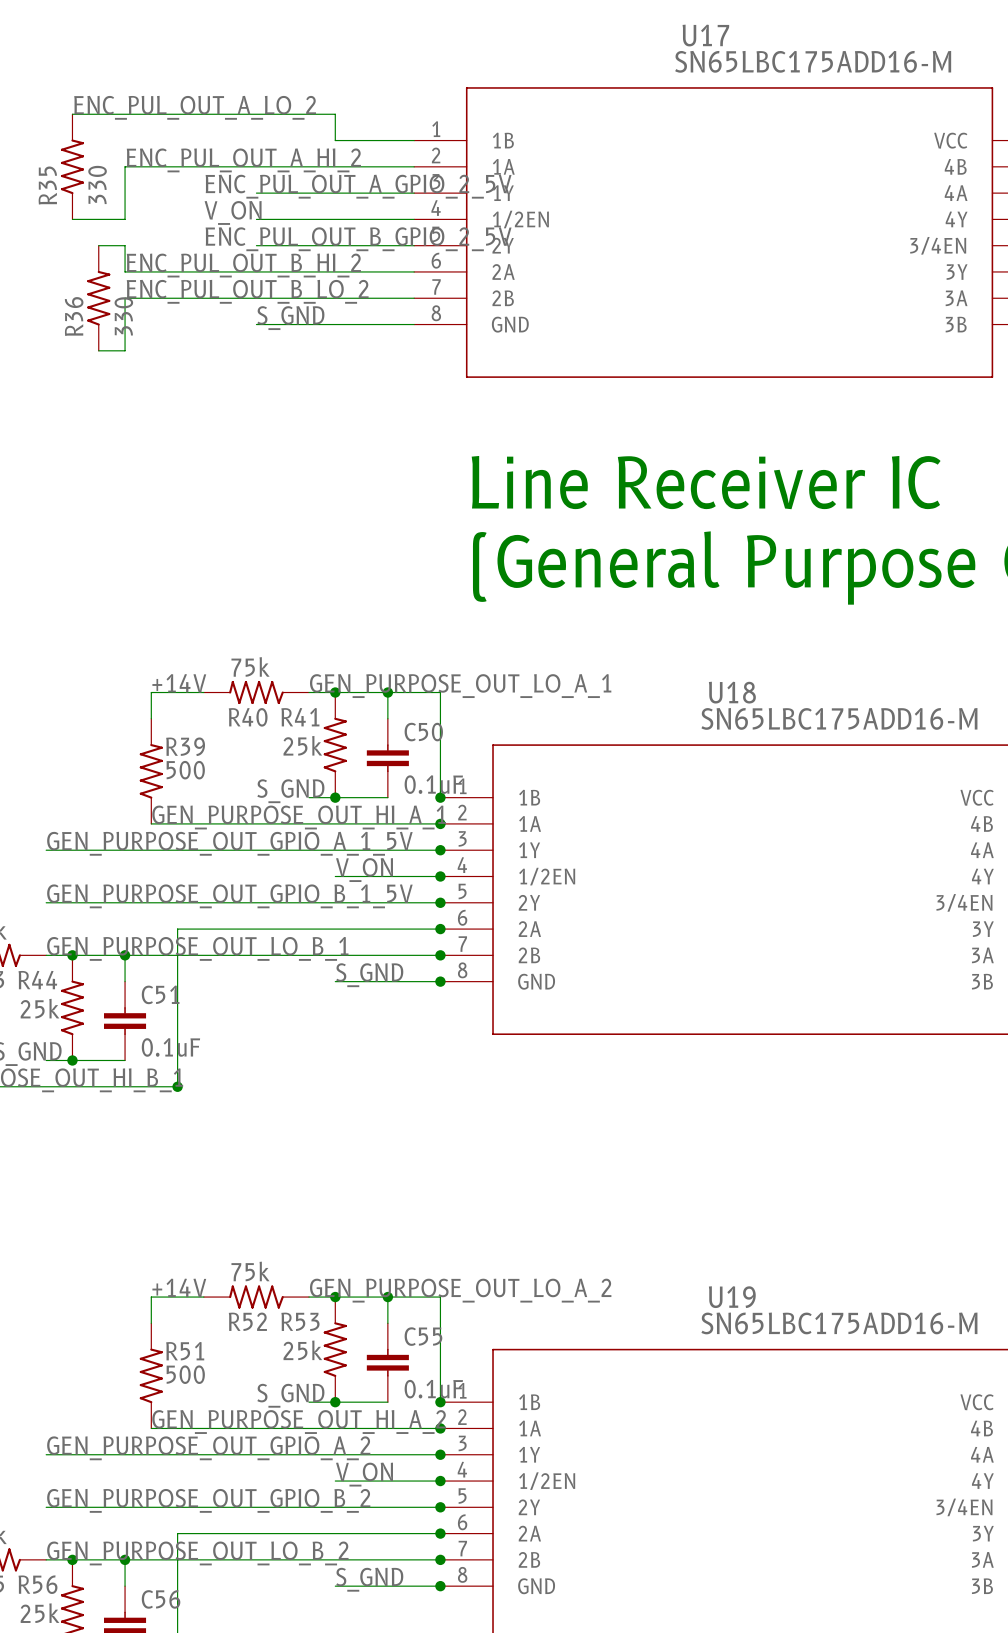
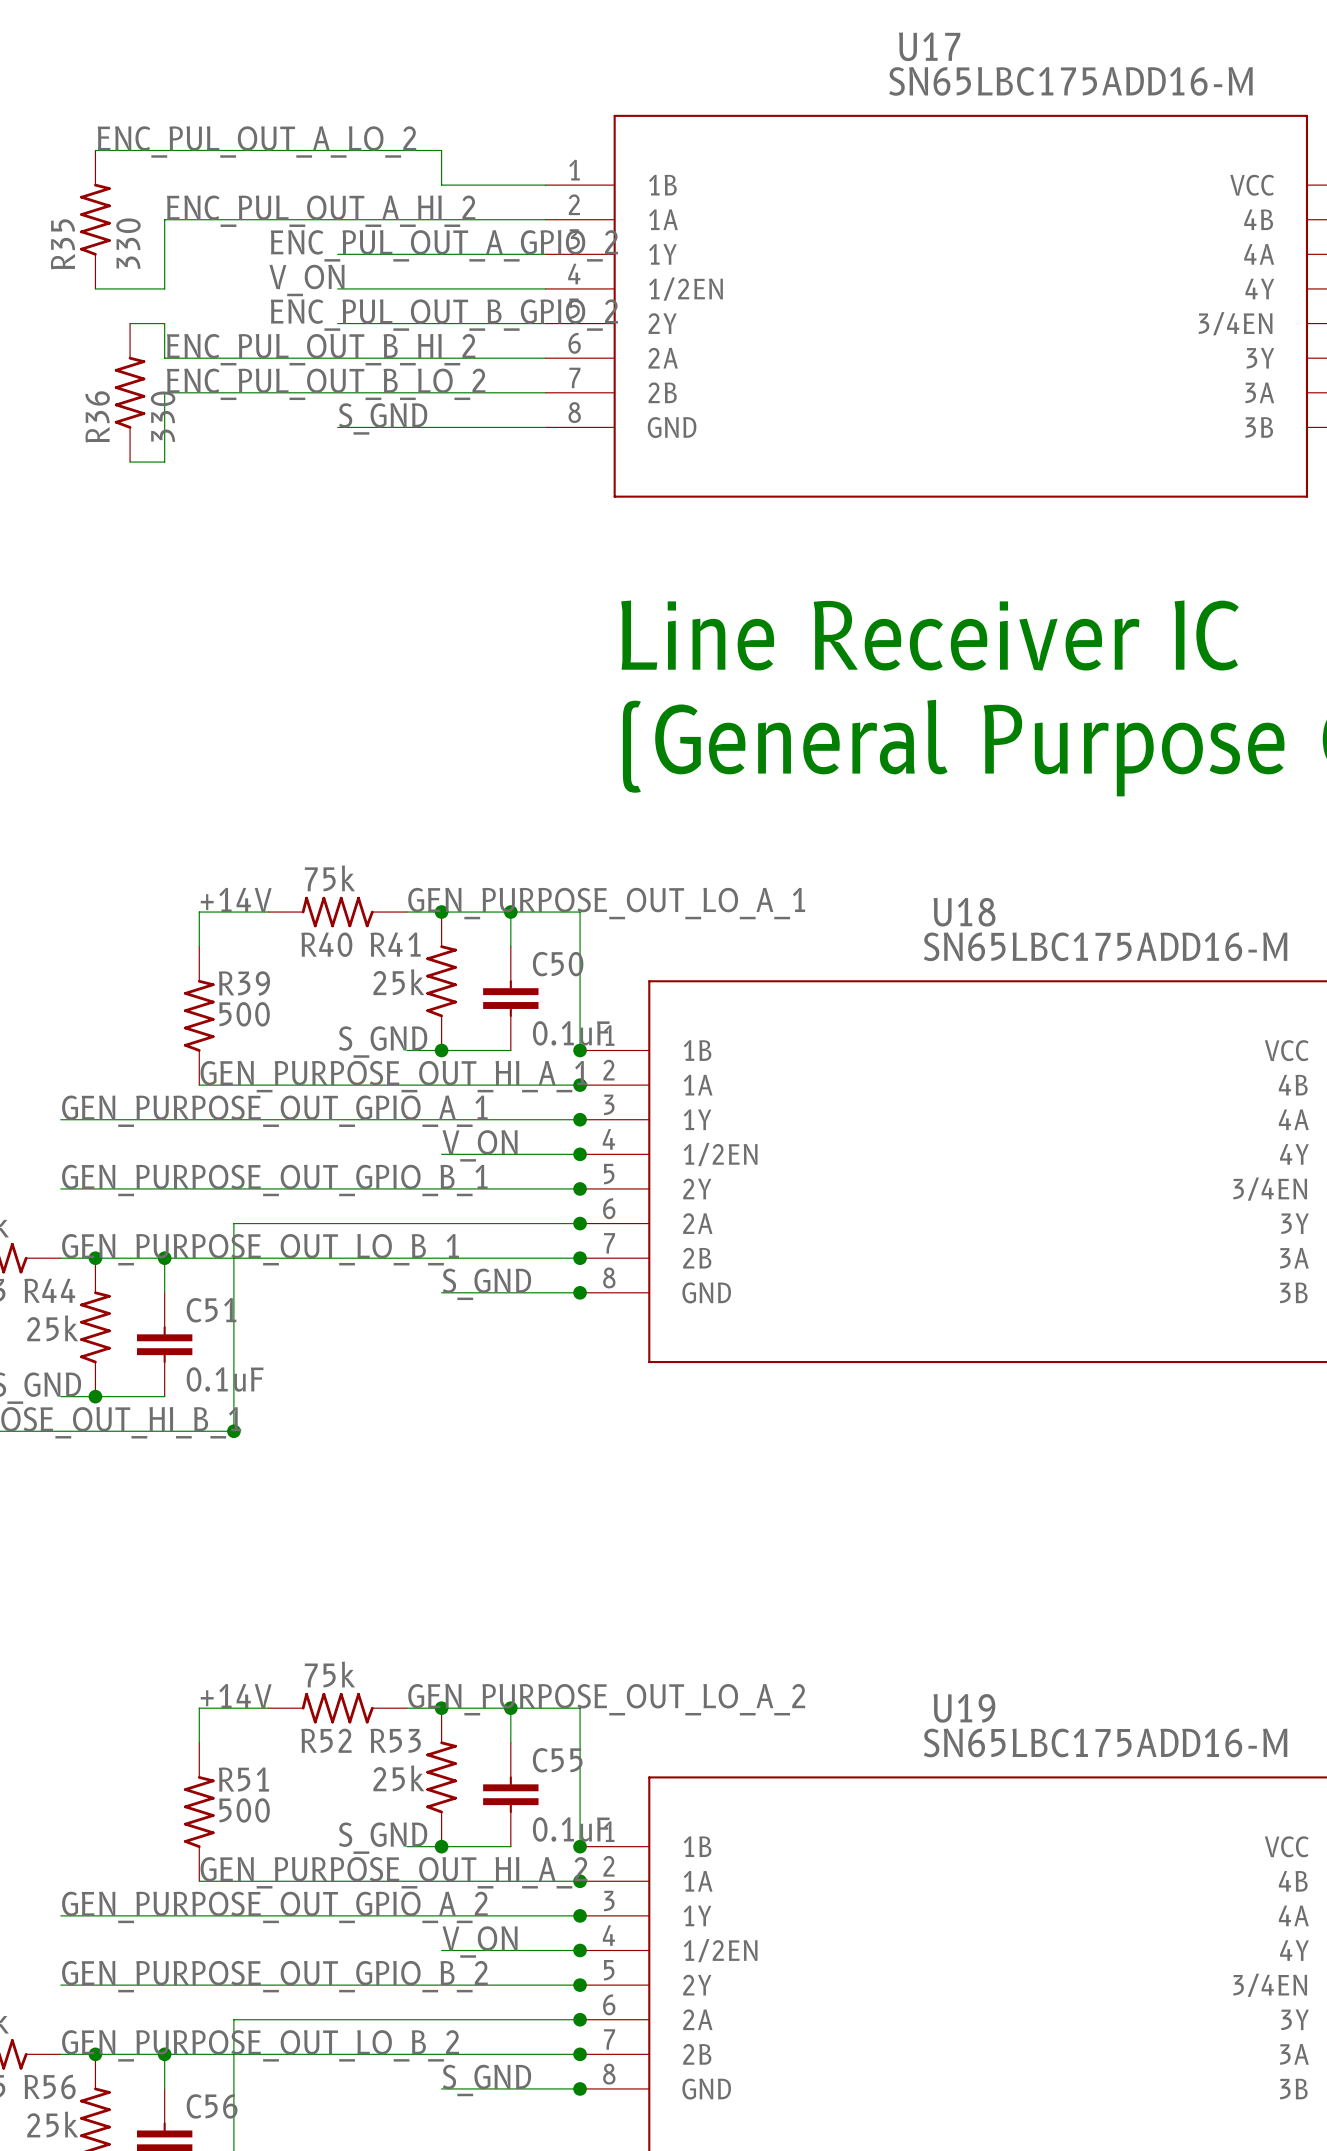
label: ENC_PUL_OUT_A_GPIO_2_5V (358, 186) -> ENC_PUL_OUT_A_GPIO_2 (444, 245)
label: ENC_PUL_OUT_B_GPIO_2_5V (358, 239) -> ENC_PUL_OUT_B_GPIO_2 (444, 315)
label: GEN_PURPOSE_OUT_GPIO_A_1_5V (229, 843) -> GEN_PURPOSE_OUT_GPIO_A_1 (274, 1111)
label: GEN_PURPOSE_OUT_GPIO_B_1_5V (229, 896) -> GEN_PURPOSE_OUT_GPIO_B_1 (274, 1180)

